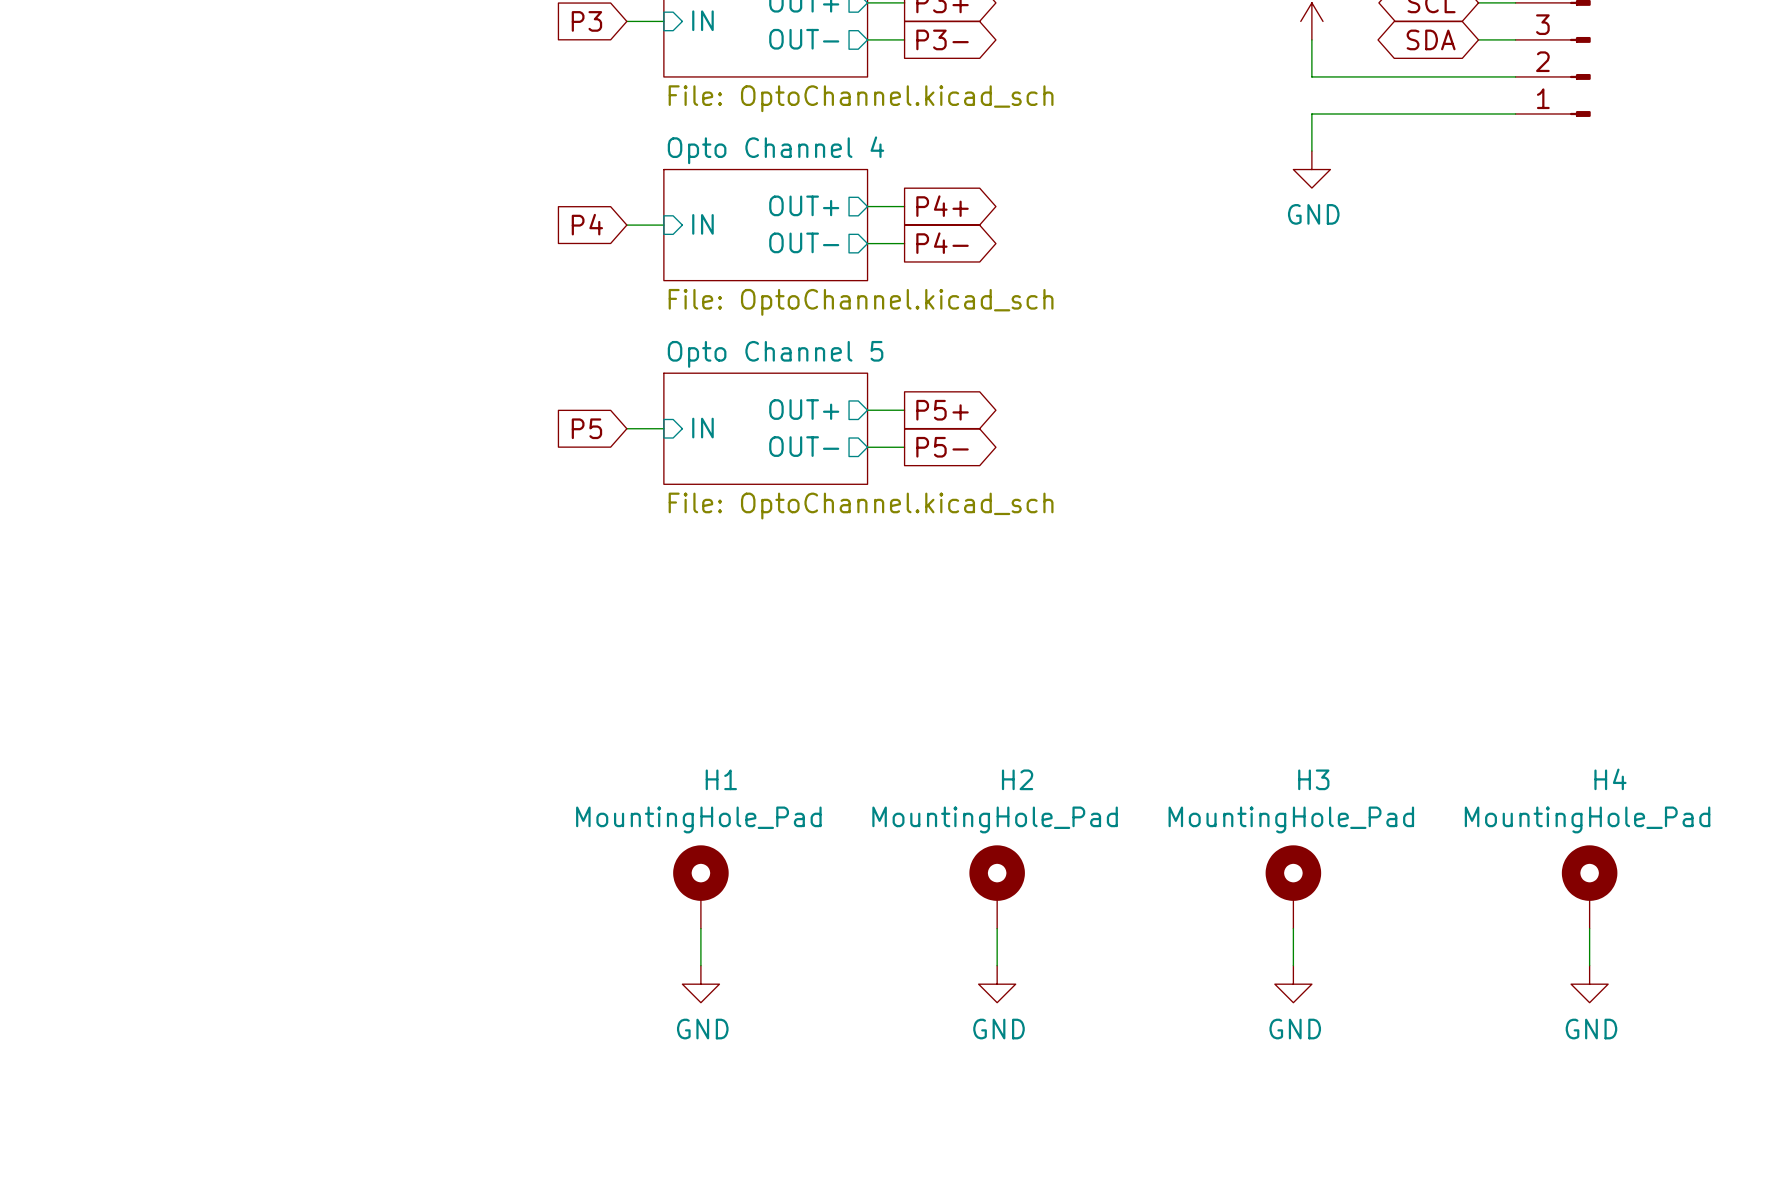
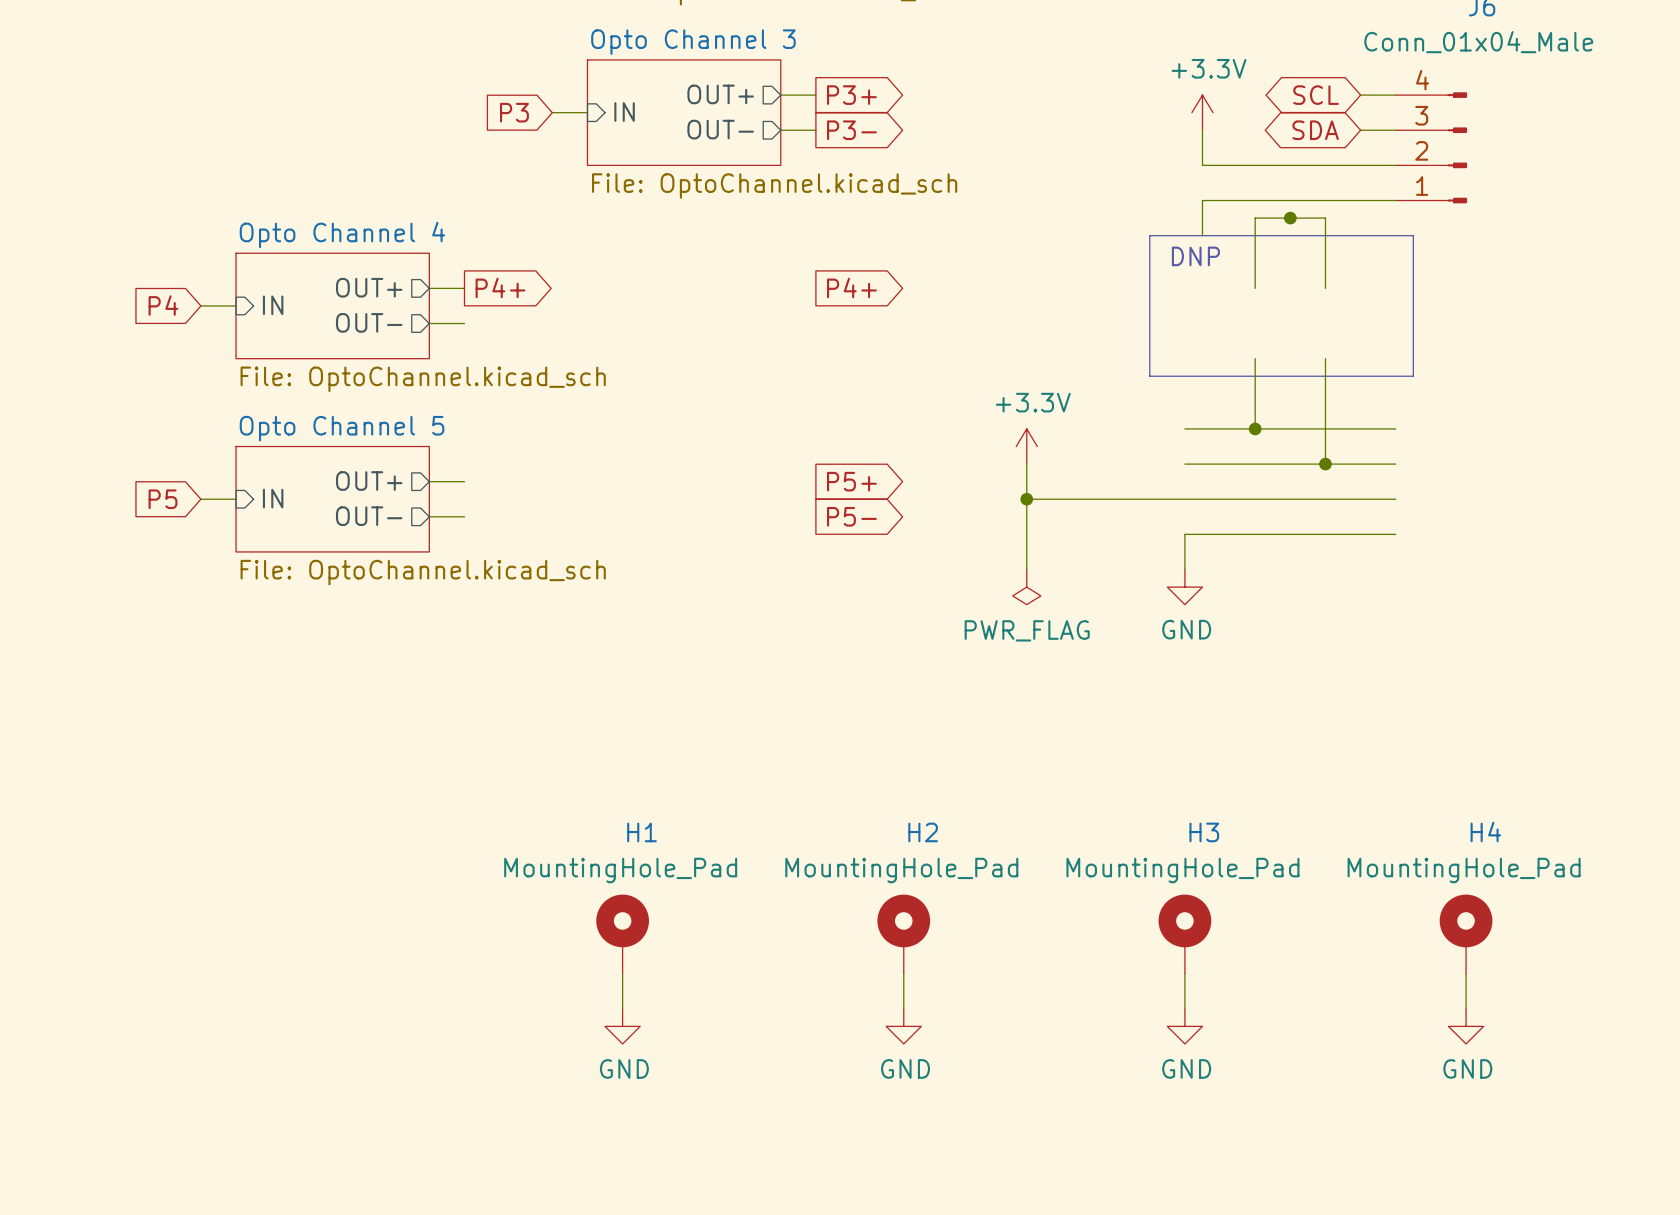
junction: none -> (1290, 218)
line: none -> (1149, 235) (1413, 235) (1413, 376) (1149, 376) (1149, 235)
power symbol position: GND (1311, 169) -> GND (1184, 587)
text: none -> DNP (1195, 256)
sheet pin: none -> OUT+ (369, 287)
sheet pin: OUT+ (804, 205) -> none
wire: none -> (429, 288) (464, 288)
wire: (867, 206) (904, 206) -> none
wire: none -> (1255, 288) (1255, 218) (1325, 218) (1325, 288)
global label: none -> P4 (163, 305)
sheet pin: none -> IN (273, 305)
global label shape: input (587, 224) -> output (500, 287)
global label: P4 (587, 224) -> P4+ (500, 287)
sheet pin: IN (702, 224) -> none
wire: none -> (200, 305) (236, 305)
wire: (626, 225) (663, 225) -> (429, 323) (464, 323)
sheet Opto Channel 4 position: (765, 225) -> (332, 305)
sheet pin: none -> OUT- (369, 322)
sheet pin: OUT- (804, 242) -> none
wire: (867, 243) (904, 243) -> none
global label: P4- (942, 243) -> none
wire: none -> (1255, 358) (1255, 428)
wire: none -> (1325, 358) (1325, 464)
wire: none -> (1184, 428) (1395, 428)
junction: none -> (1255, 428)
power symbol: none -> +3.3V (1026, 446)
wire: none -> (1026, 464) (1026, 569)
wire: none -> (1184, 464) (1395, 464)
junction: none -> (1325, 464)
sheet pin: none -> OUT+ (369, 481)
sheet pin: OUT+ (804, 409) -> none
wire: (867, 410) (904, 410) -> none
global label: none -> P5 (163, 499)
wire: none -> (200, 499) (236, 499)
sheet pin: none -> IN (273, 498)
global label: P5 (586, 428) -> none
wire: (626, 428) (663, 428) -> (429, 481) (464, 481)
sheet pin: IN (702, 428) -> none
sheet Opto Channel 5 position: (765, 428) -> (332, 499)
wire: none -> (1026, 499) (1395, 499)
junction: none -> (1026, 499)
sheet pin: none -> OUT- (369, 516)
sheet pin: OUT- (804, 446) -> none
wire: none -> (429, 516) (464, 516)
wire: (867, 447) (904, 447) -> none
wire: none -> (1395, 534) (1184, 534) (1184, 569)
power symbol: none -> PWR_FLAG (1026, 587)

